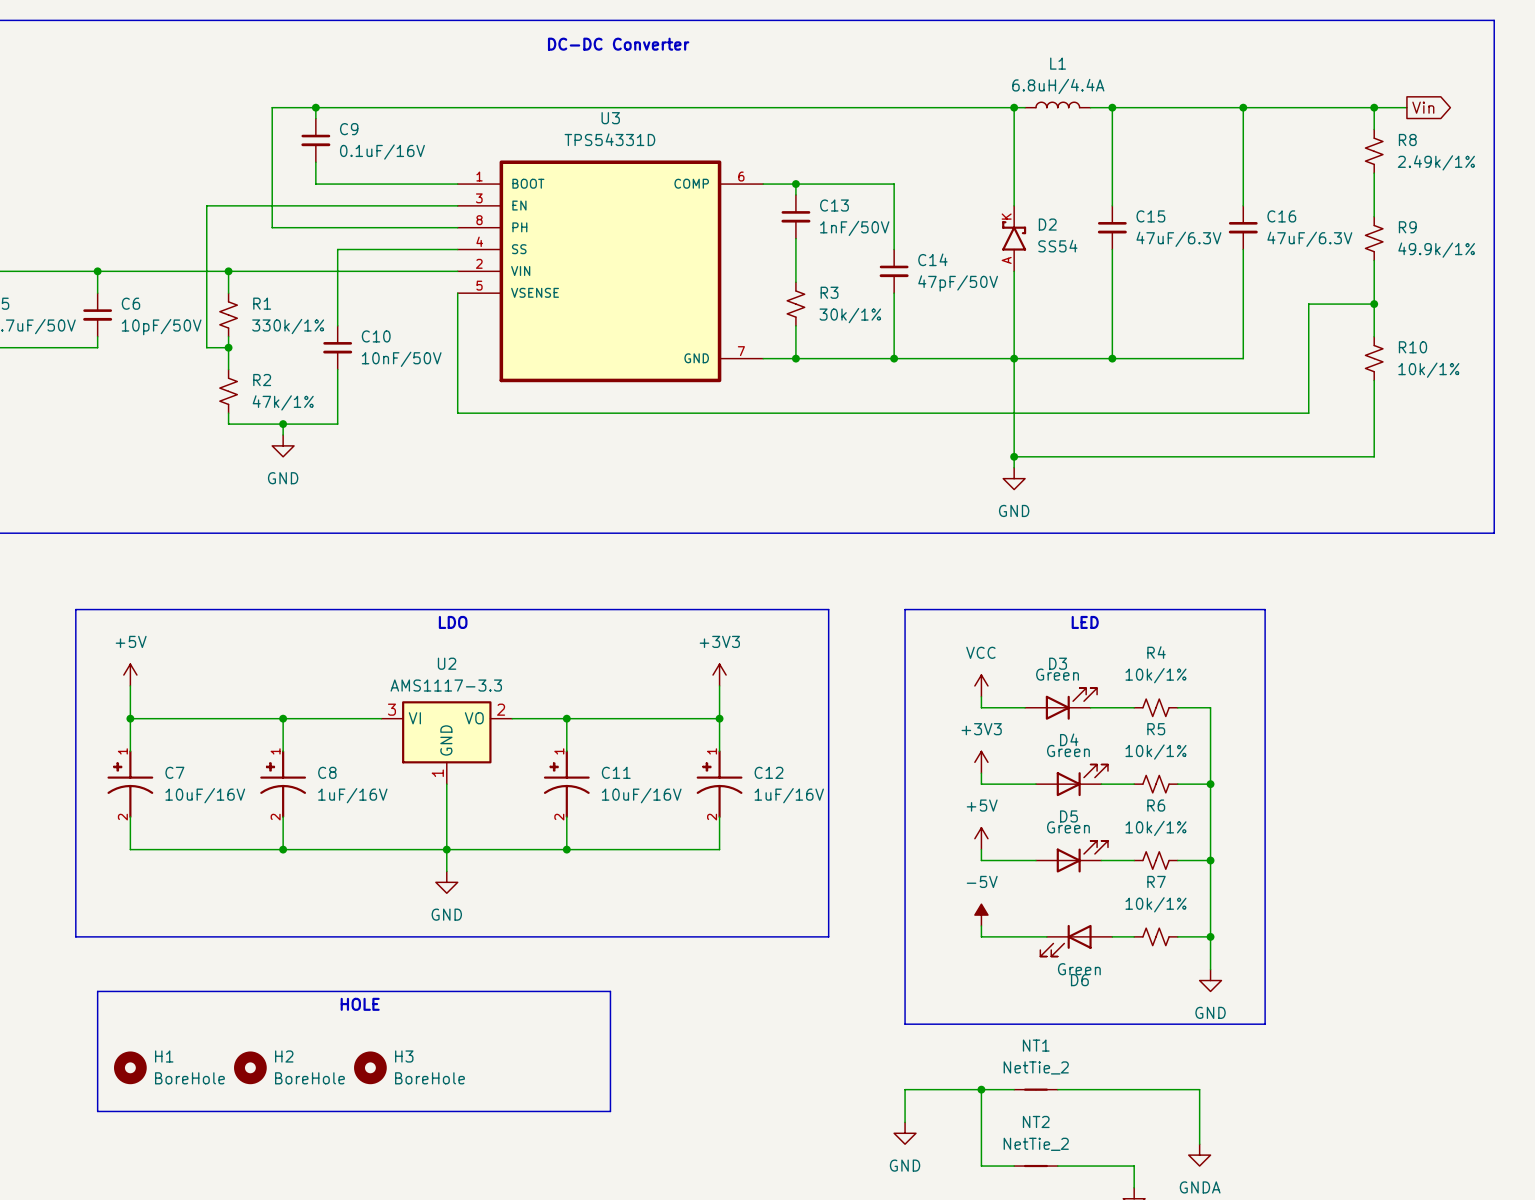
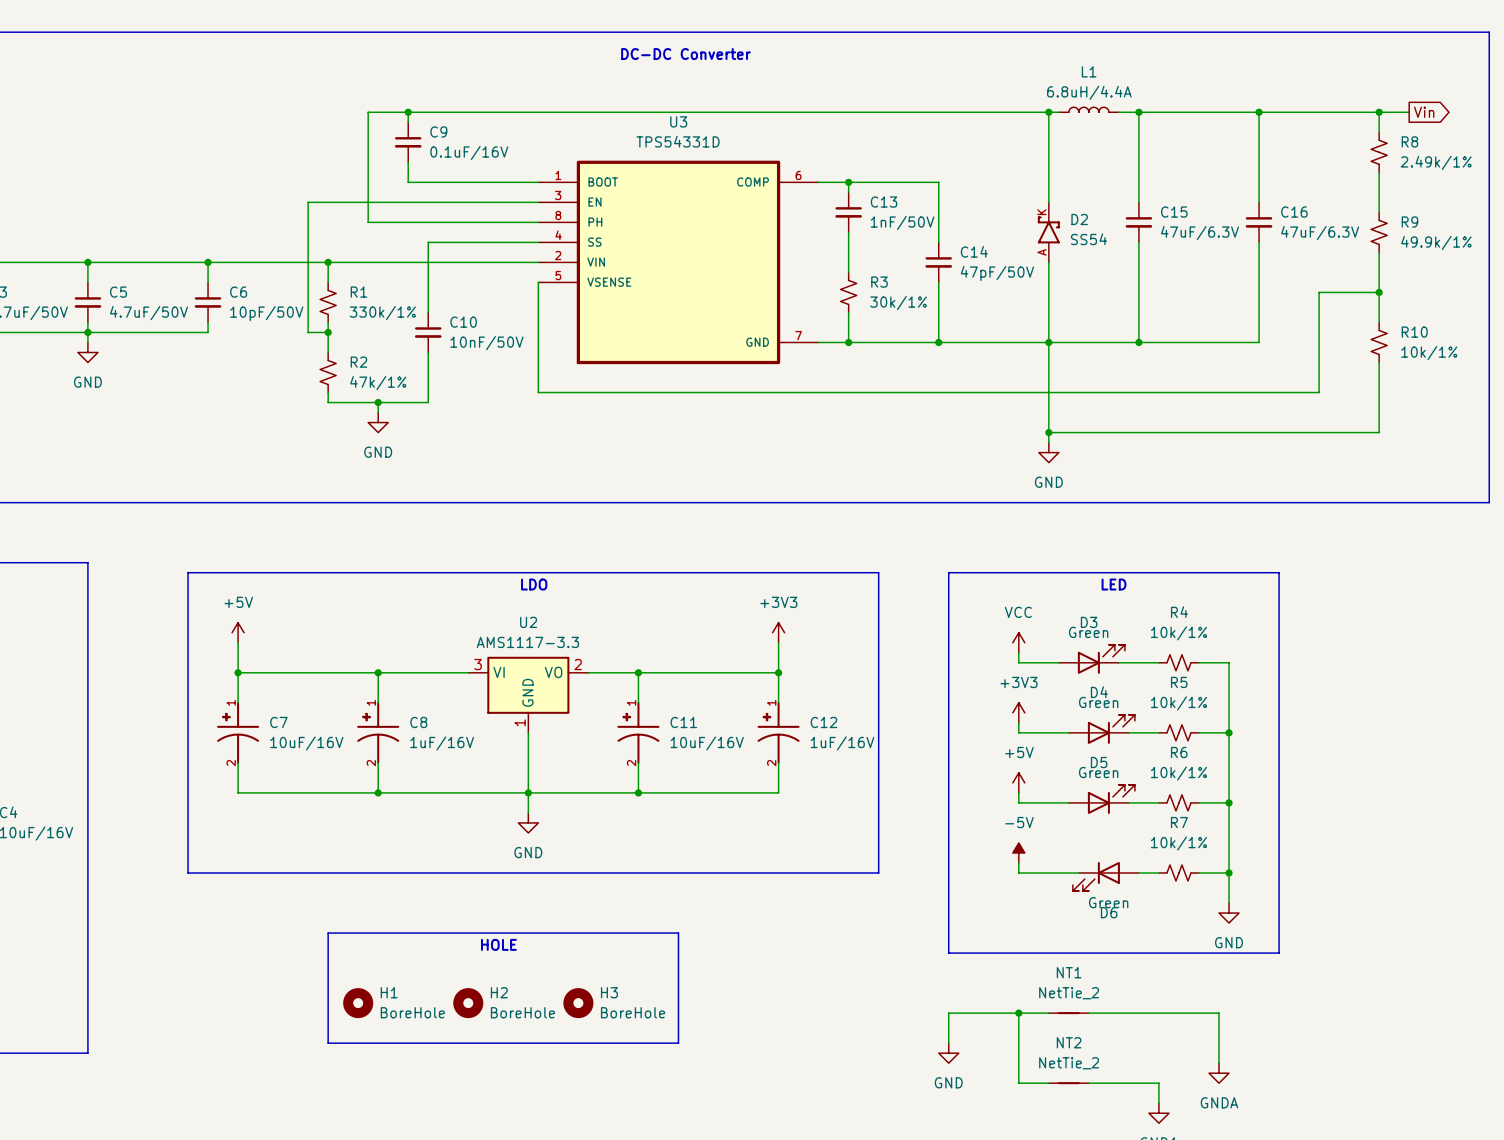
line: (610, 1002) (610, 991) (97, 991) (97, 1111) (610, 1111) -> (678, 933) (328, 933) (328, 1043) (678, 1043) (678, 1033)
text position: HOLE (360, 1004) -> HOLE (498, 944)
H1 position: (130, 1067) -> (358, 1003)
H2 position: (250, 1067) -> (468, 1003)
H3 position: (370, 1067) -> (578, 1003)

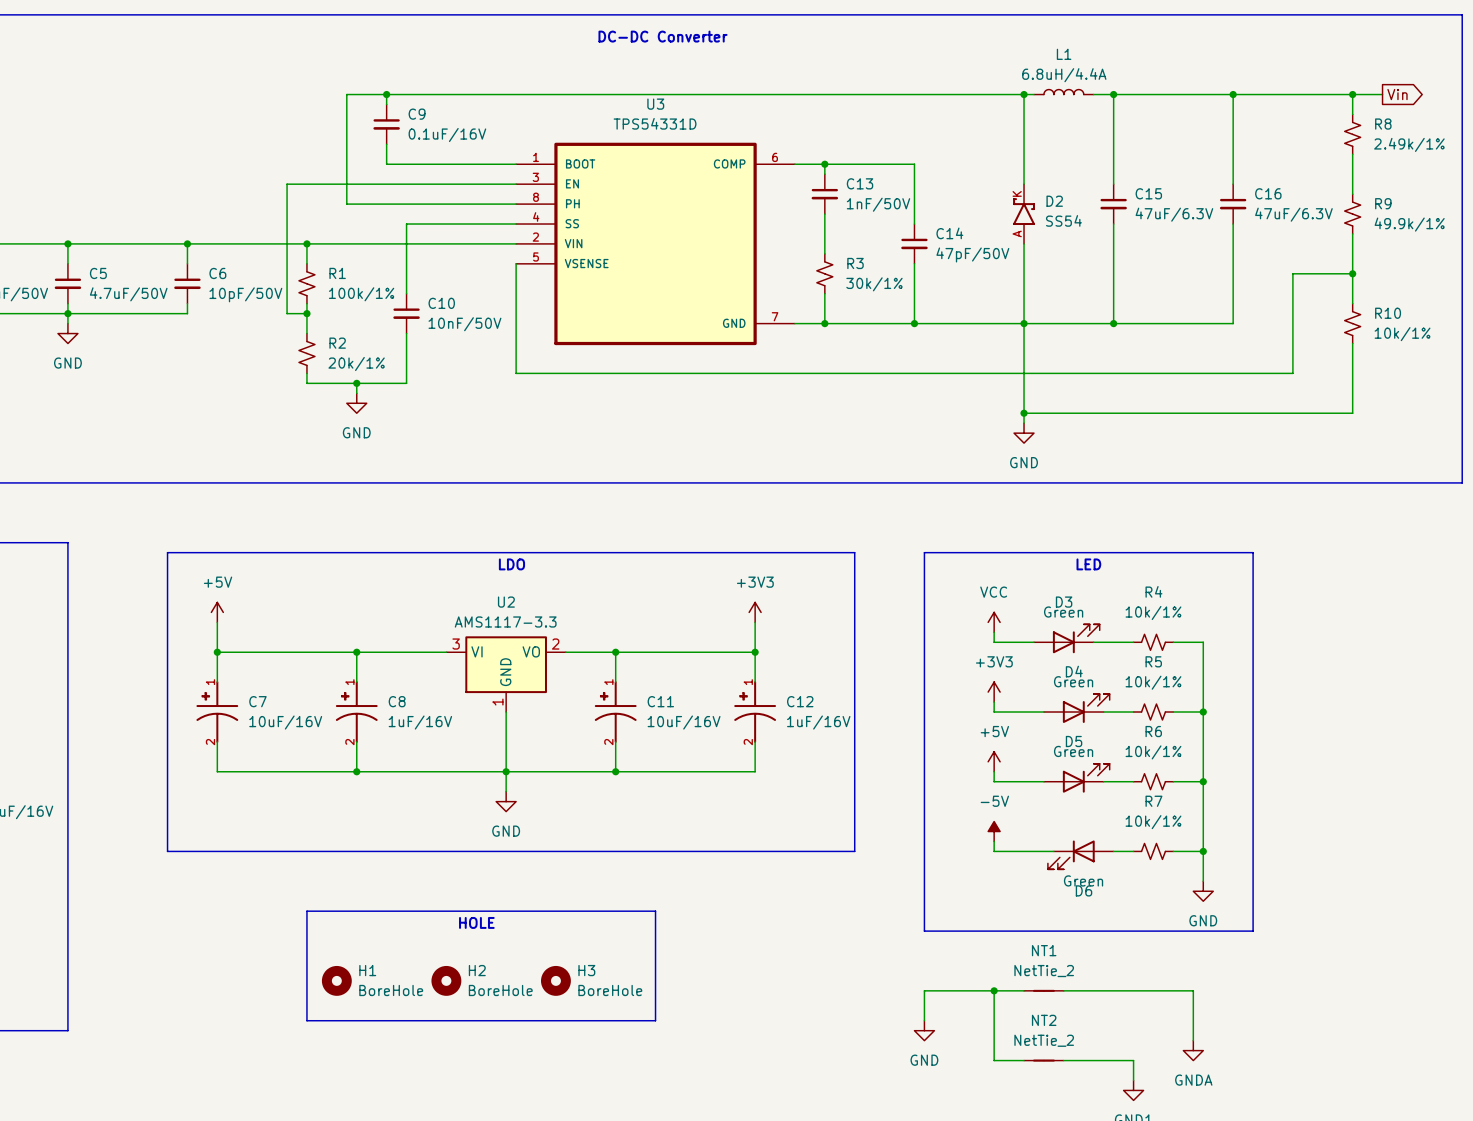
R1 value: 330k/1% (382, 313) -> 100k/1% (361, 294)
R2 value: 47k/1% (378, 383) -> 20k/1% (356, 364)

